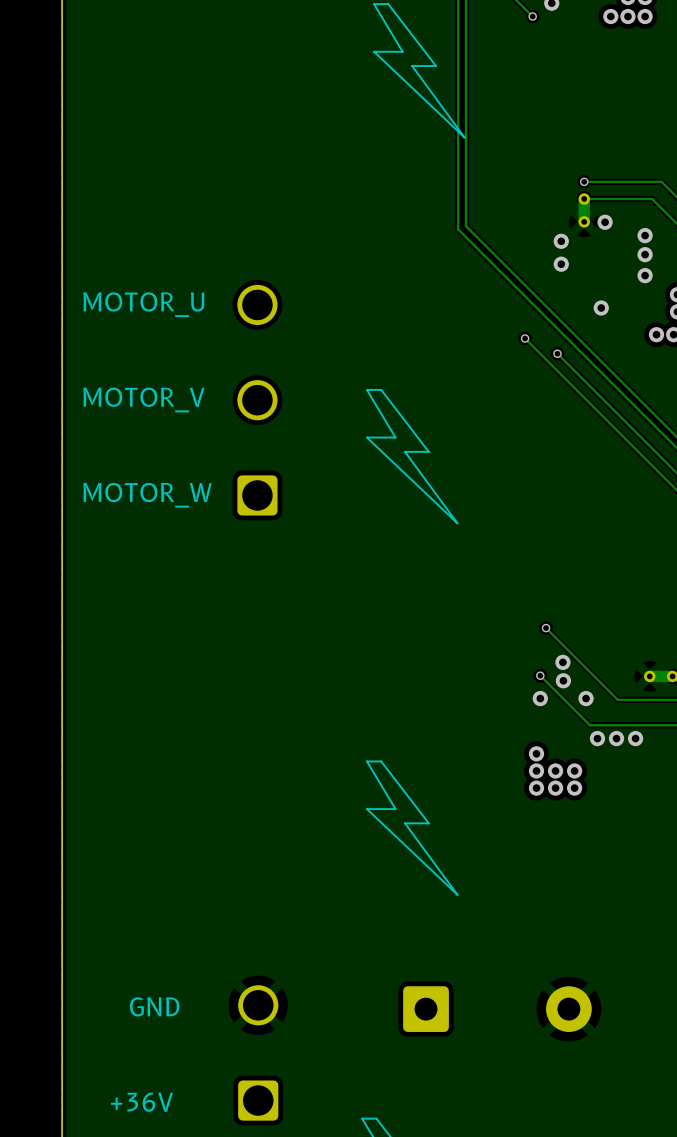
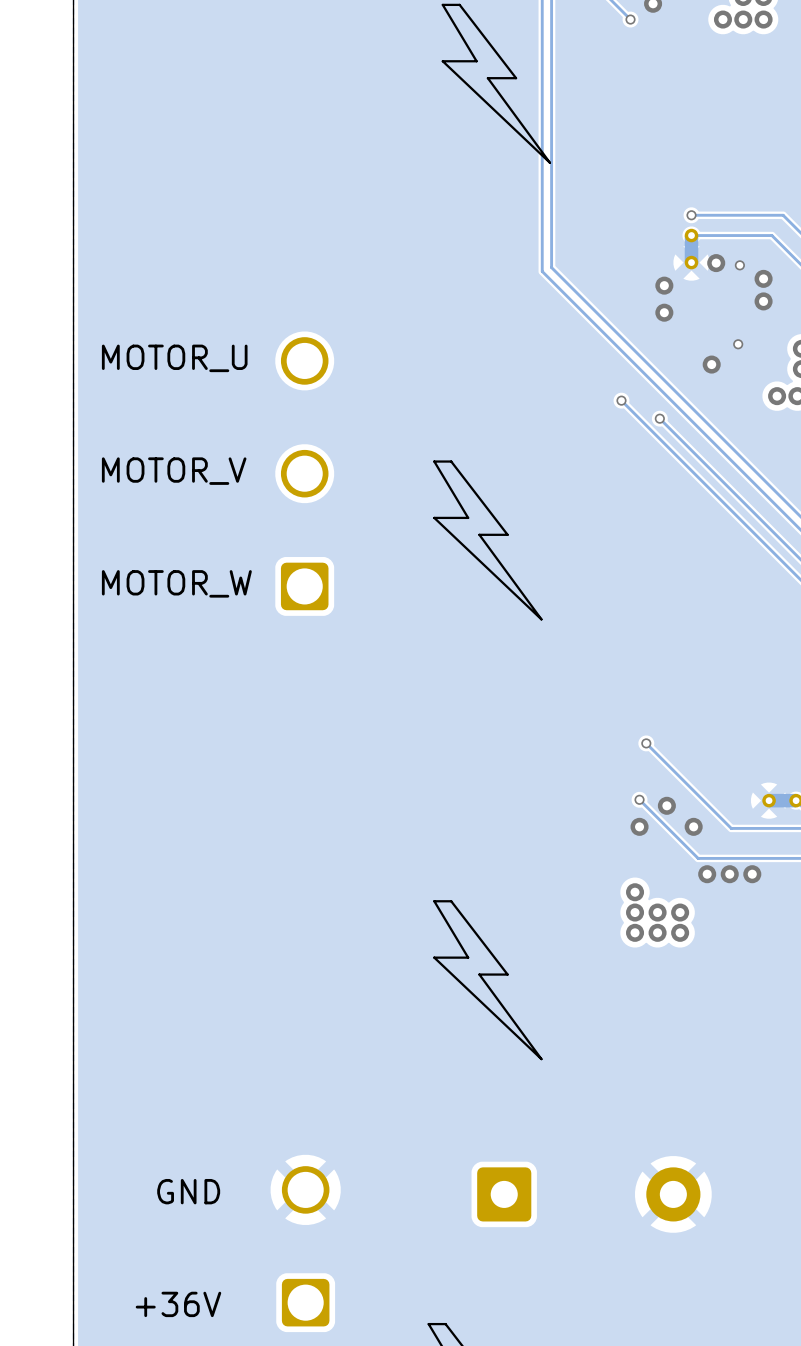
via: none -> (739, 265)
via: (645, 275) -> none
via: none -> (738, 344)
via: (562, 662) -> none

